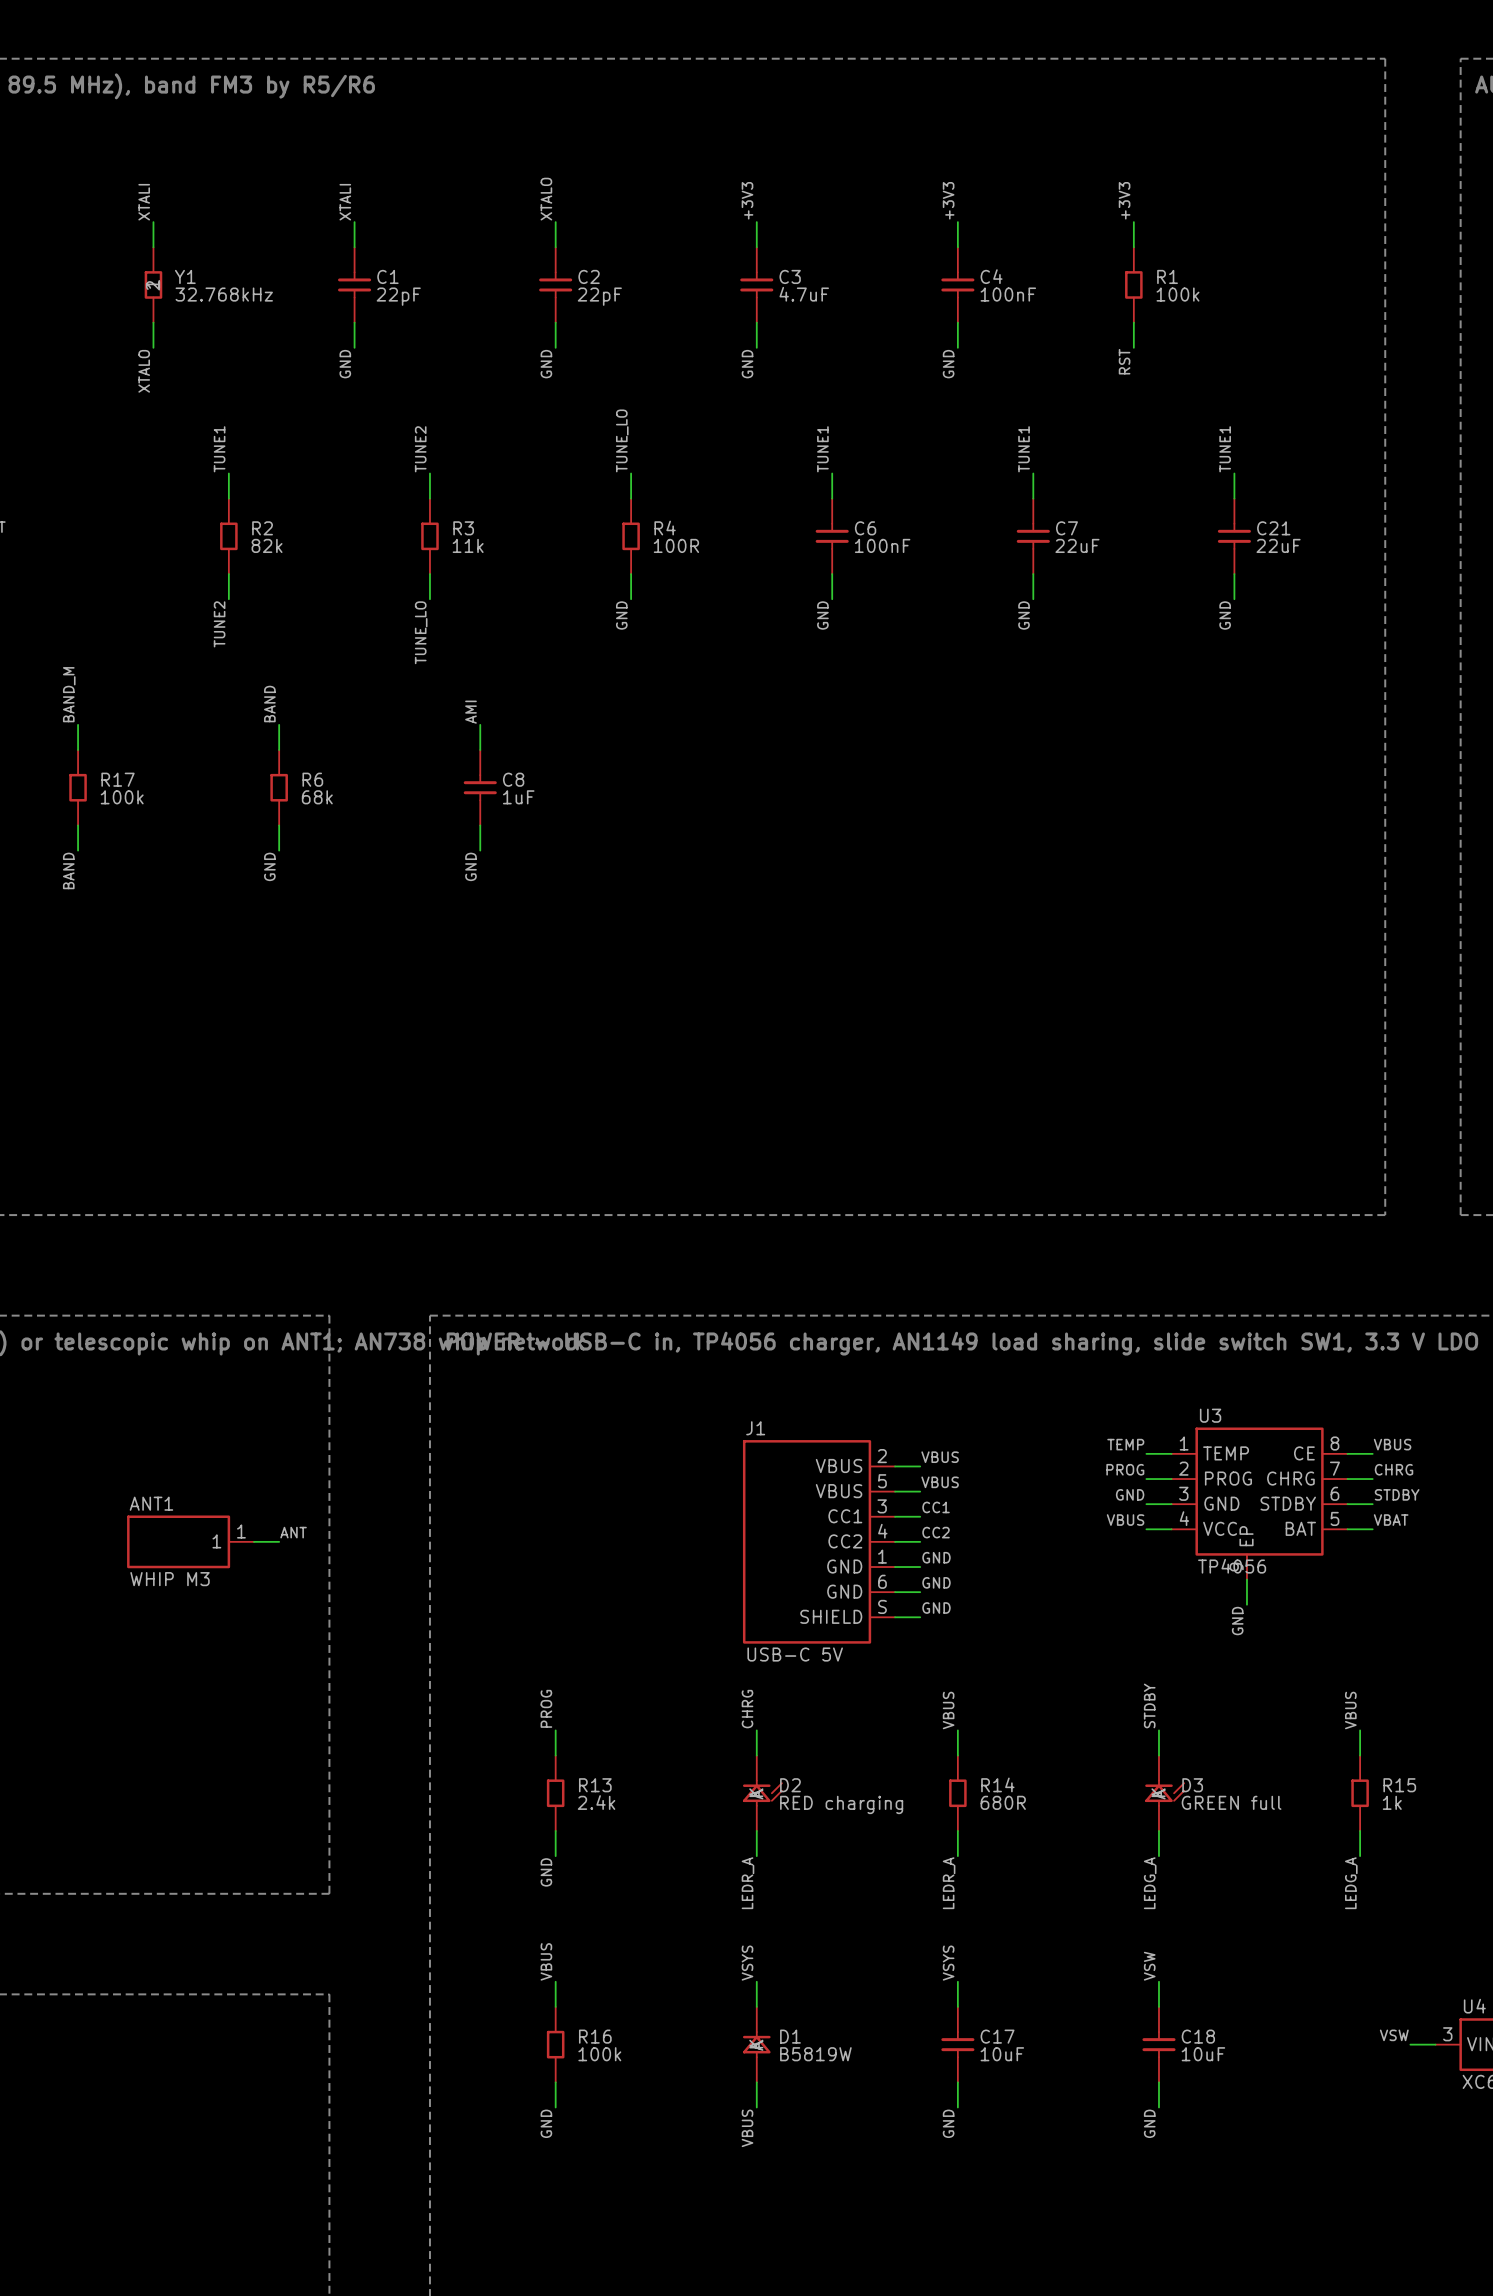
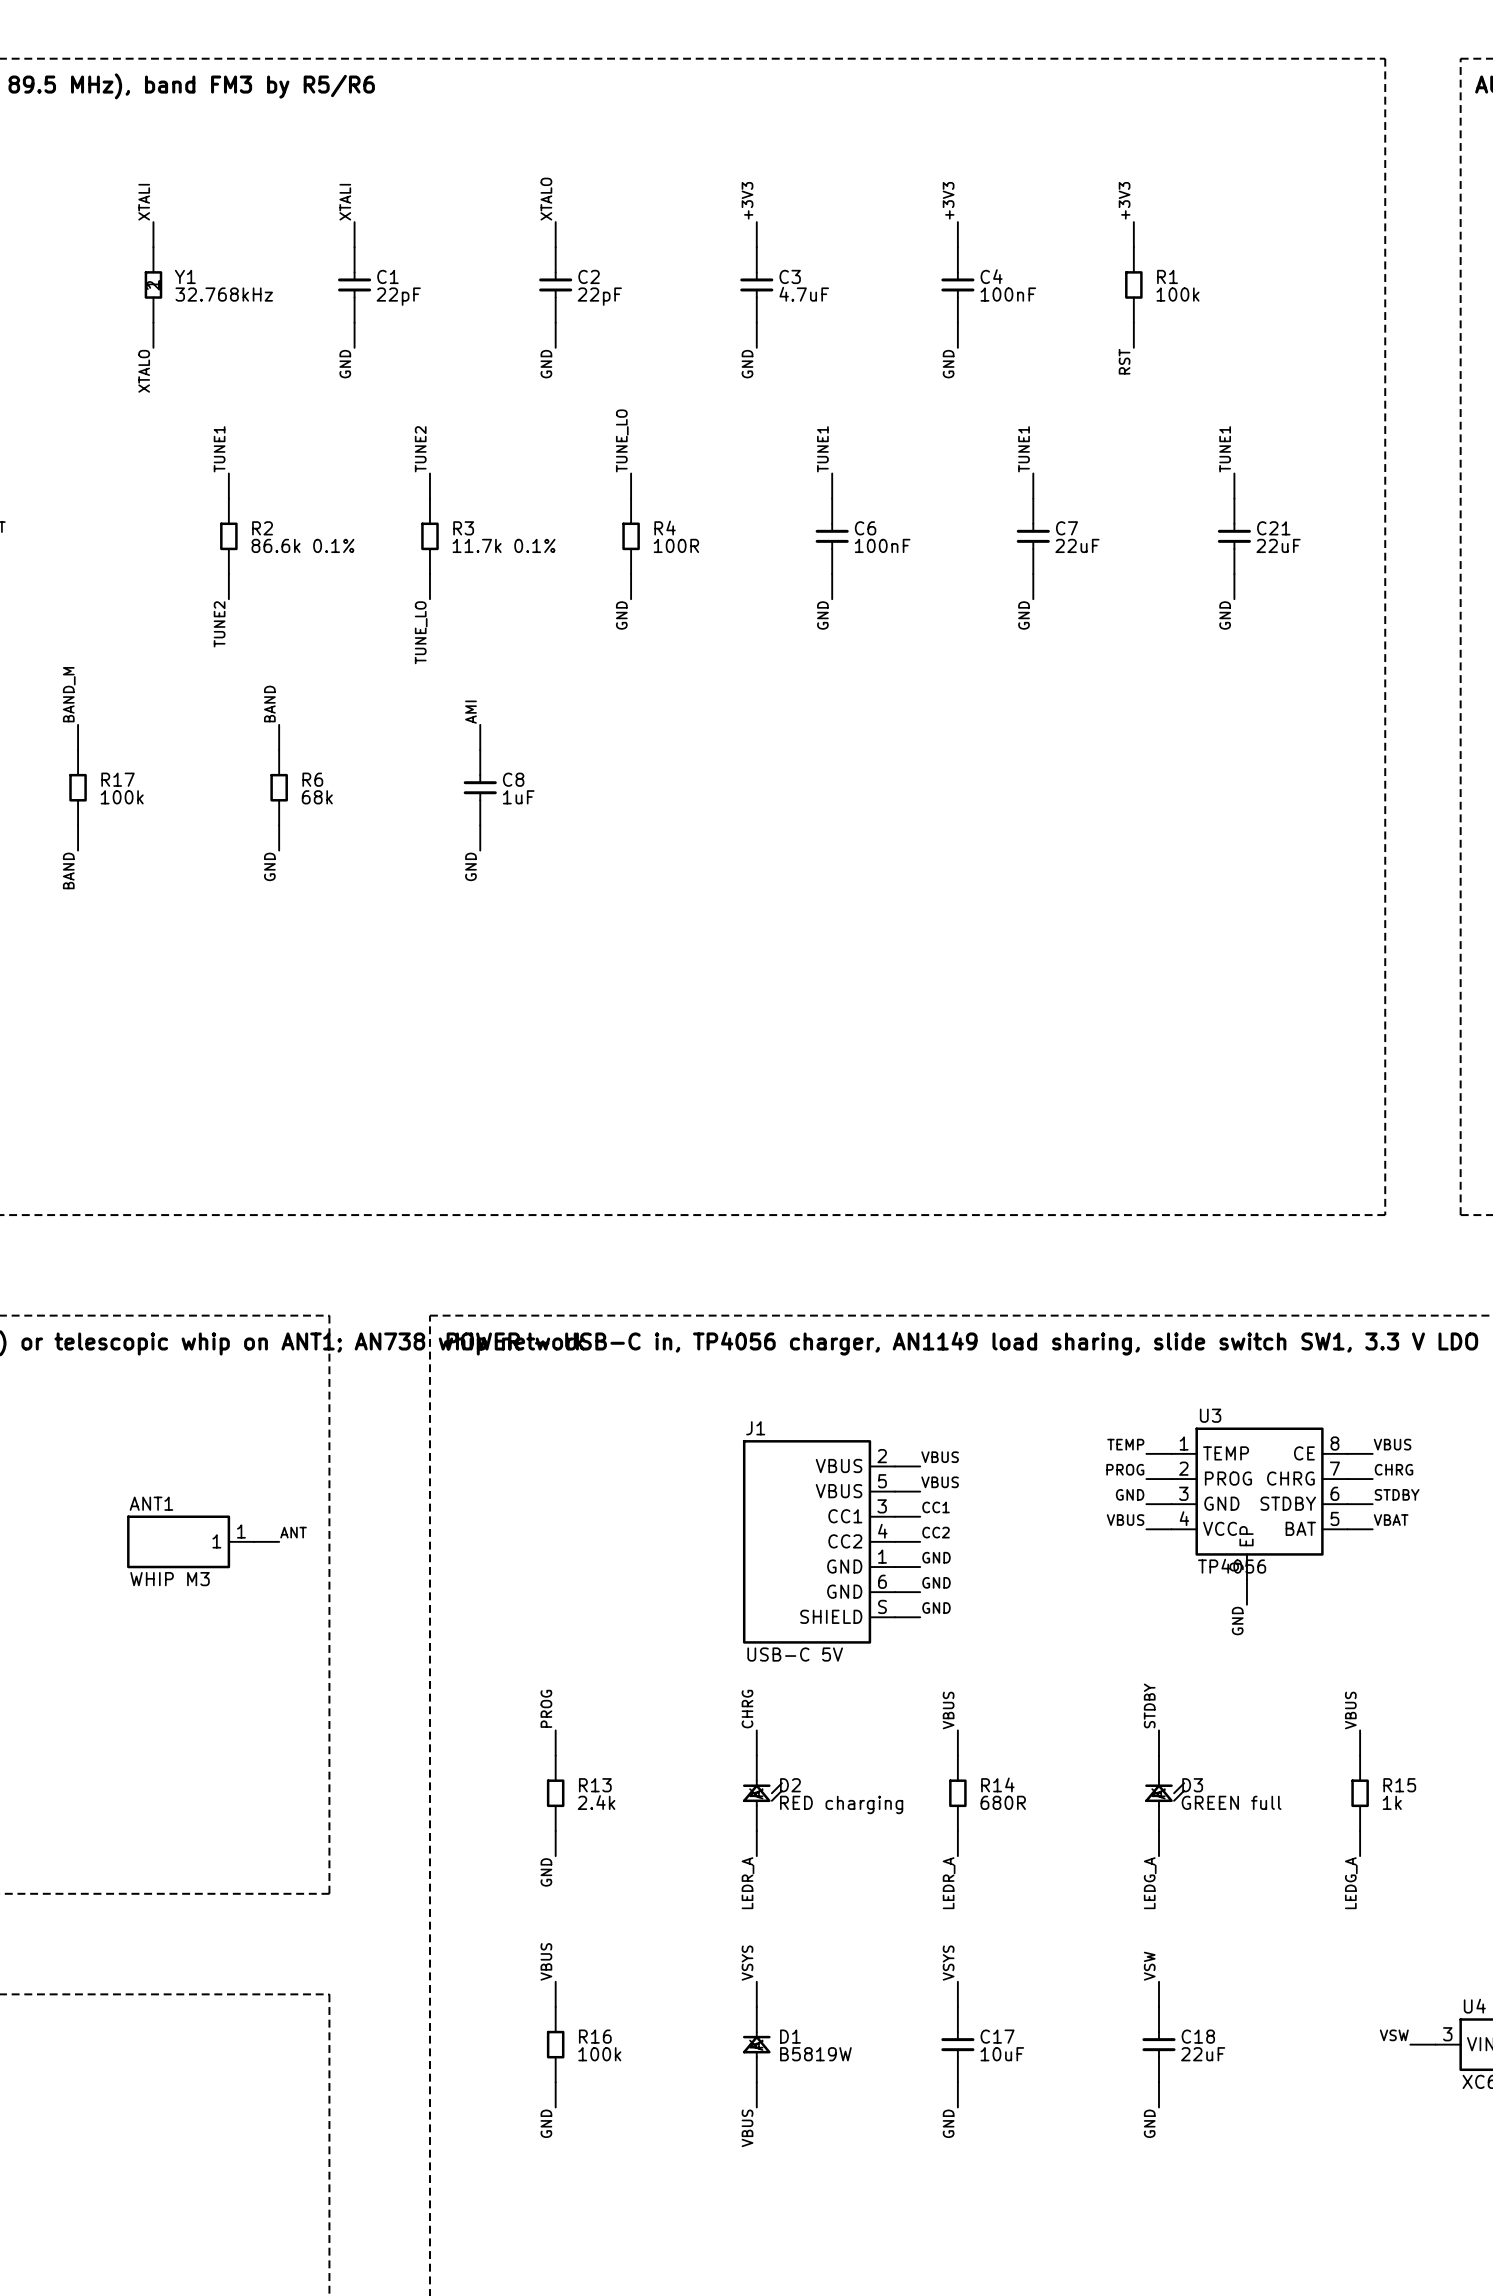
R2 value: 82k (267, 545) -> 86.6k 0.1% (302, 545)
R3 value: 11k (468, 545) -> 11.7k 0.1% (504, 545)
C18 value: 10uF (1203, 2054) -> 22uF (1203, 2054)

